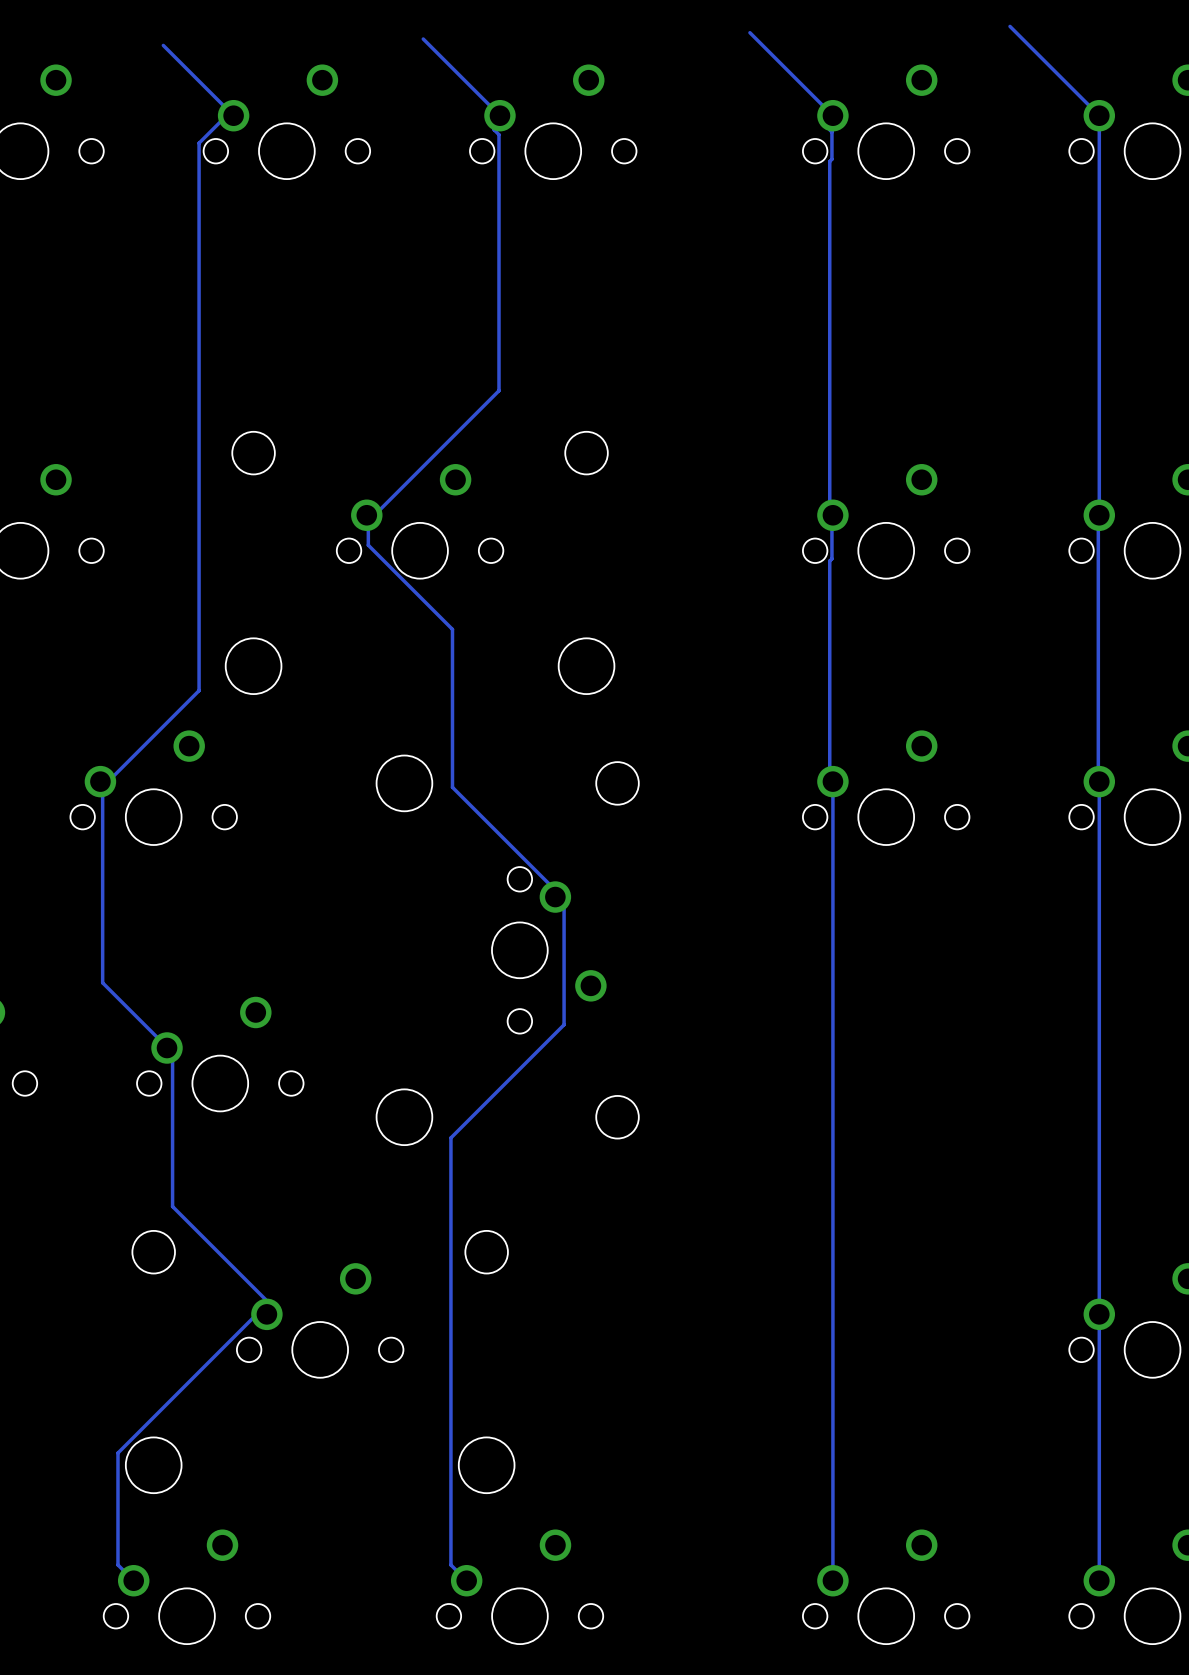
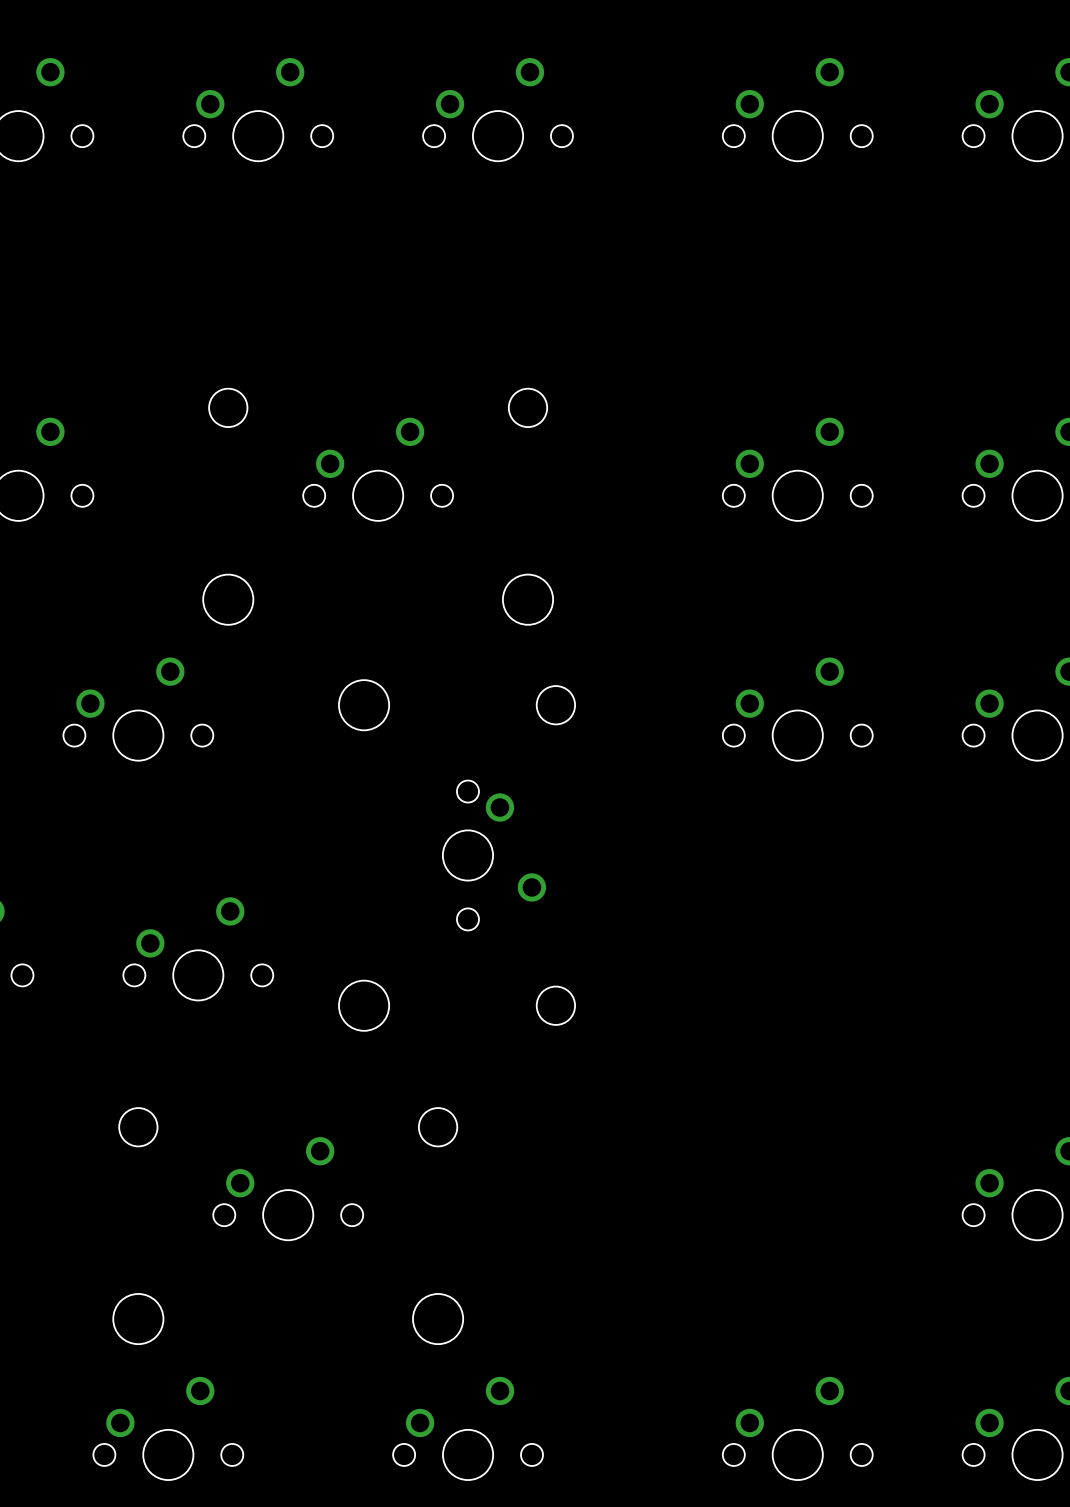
bottom track: (1010, 26) (1099, 115) -> none
bottom track: (749, 32) (832, 115) -> none
bottom track: (423, 39) (499, 115) -> none
bottom track: (163, 45) (233, 115) -> none
bottom track: (228, 115) (199, 143) (199, 690) (102, 787) (102, 982) (172, 1052) (172, 1206) (270, 1304) (266, 1304) (117, 1453) (117, 1564) (133, 1580) -> none
bottom track: (508, 115) (494, 115) (494, 129) (498, 134) (498, 390) (368, 521) (368, 545) (452, 629) (452, 787) (564, 898) (564, 1024) (450, 1137) (450, 1564) (466, 1580) -> none
bottom track: (1095, 115) (1099, 119) (1099, 515) -> none
bottom track: (829, 129) (831, 132) (831, 159) (829, 161) (829, 521) (831, 523) (831, 558) (829, 561) (829, 787) (832, 790) (832, 1580) -> none
bottom track: (1095, 521) (1098, 524) (1098, 784) (1095, 787) (1099, 790) (1099, 1580) -> none

